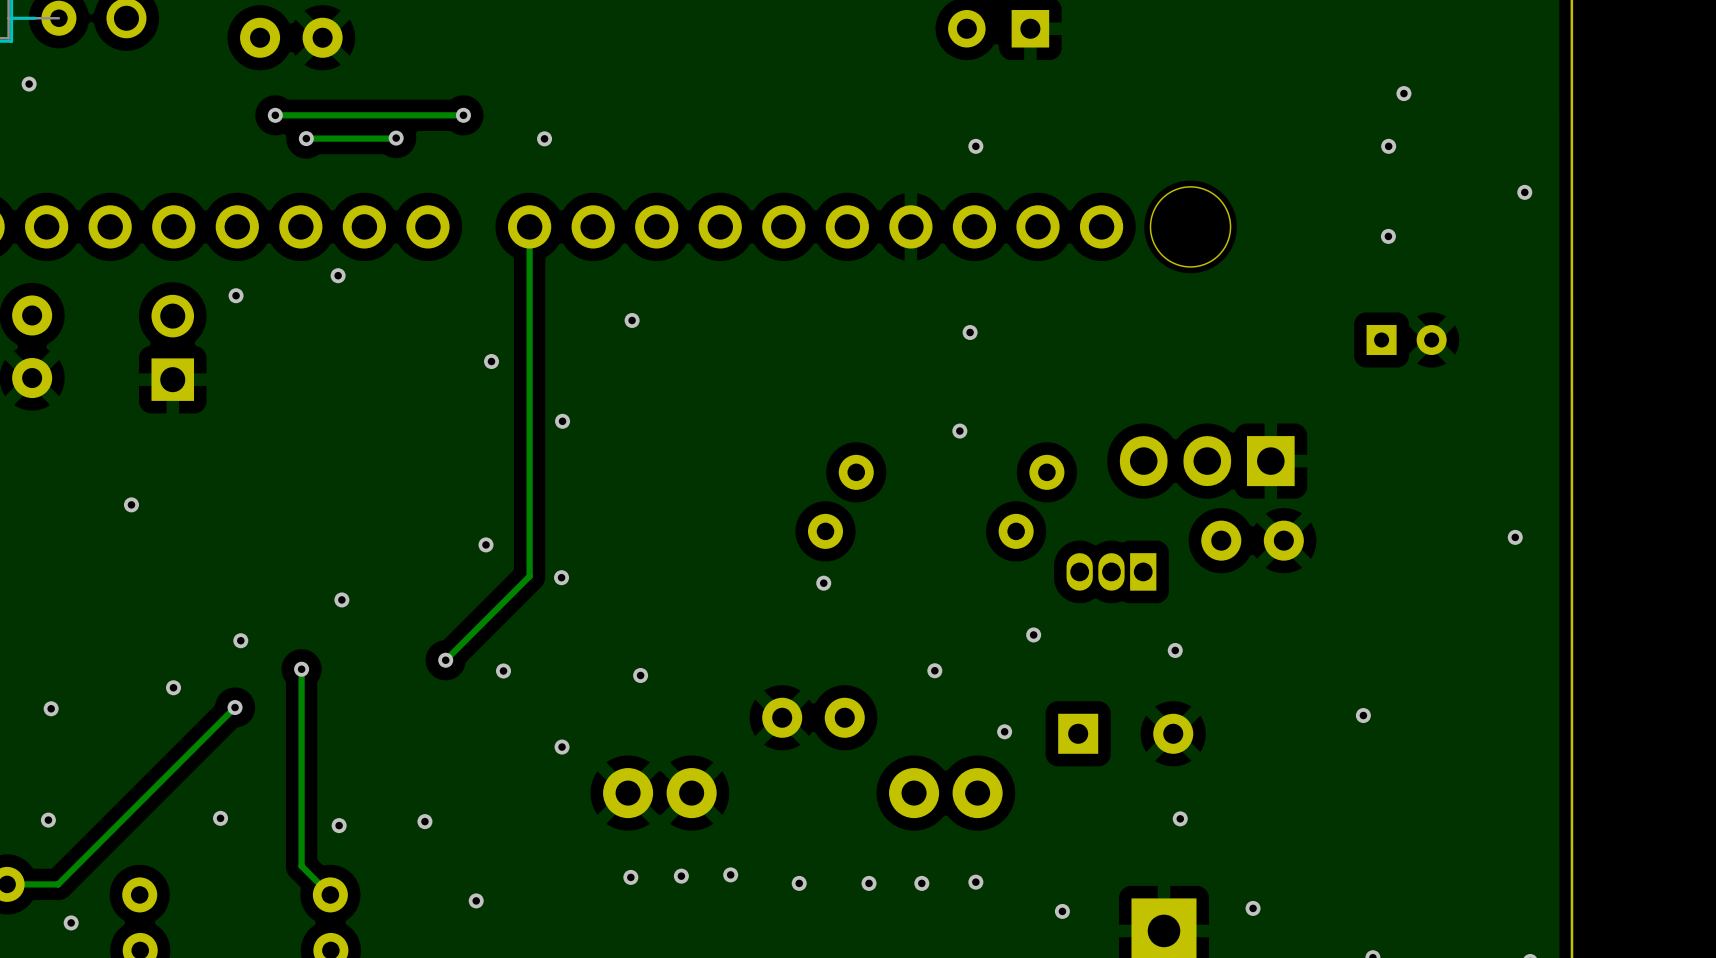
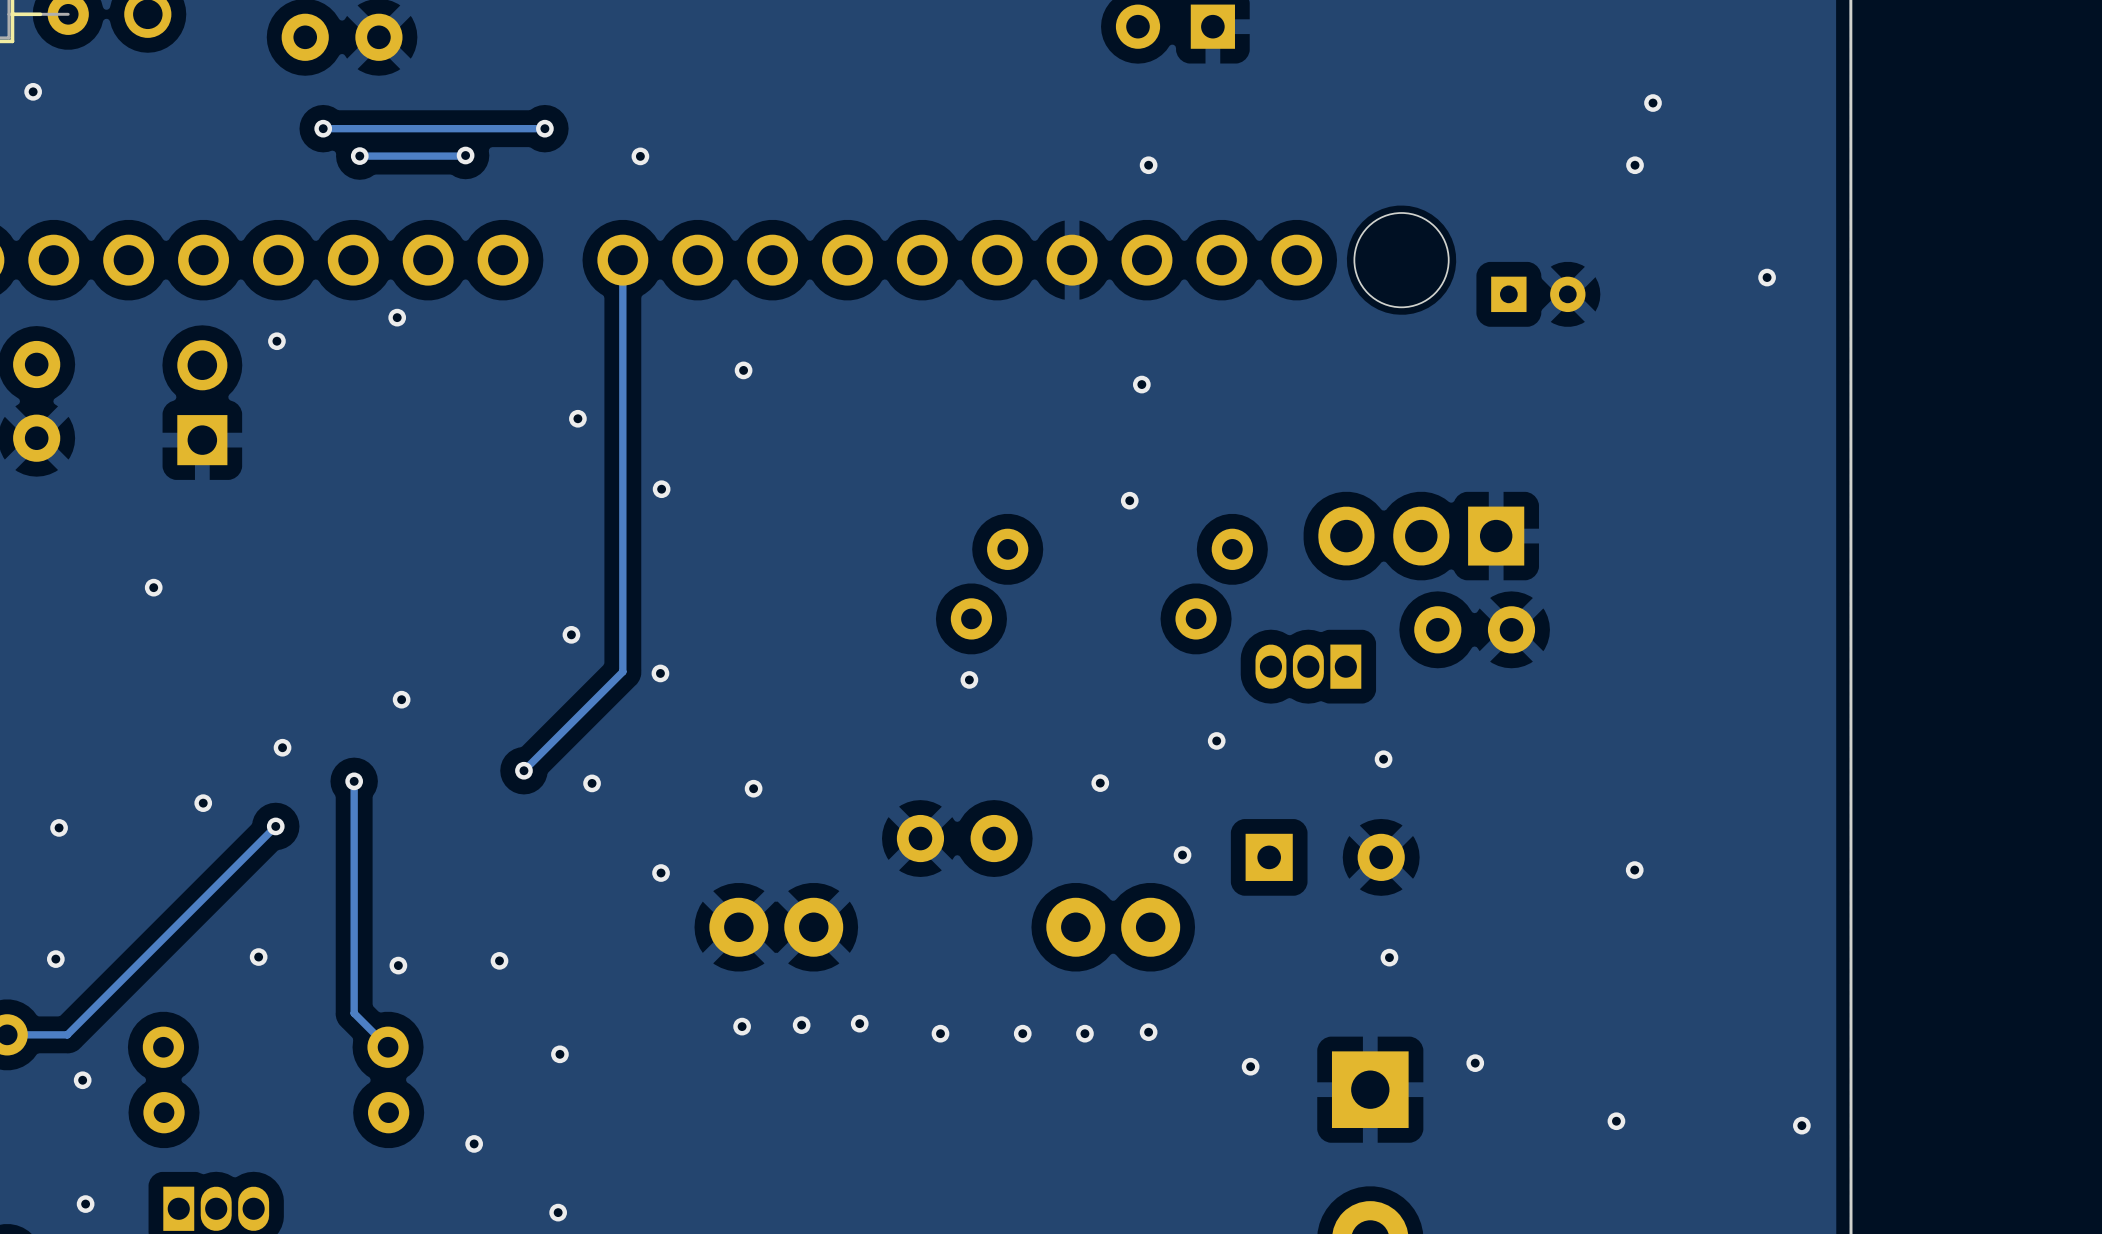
via position: (1524, 192) -> (1767, 277)
via: (1388, 236) -> none
part position: (1406, 339) -> (1538, 294)
via: (1515, 537) -> none
via position: (1363, 715) -> (1634, 870)

